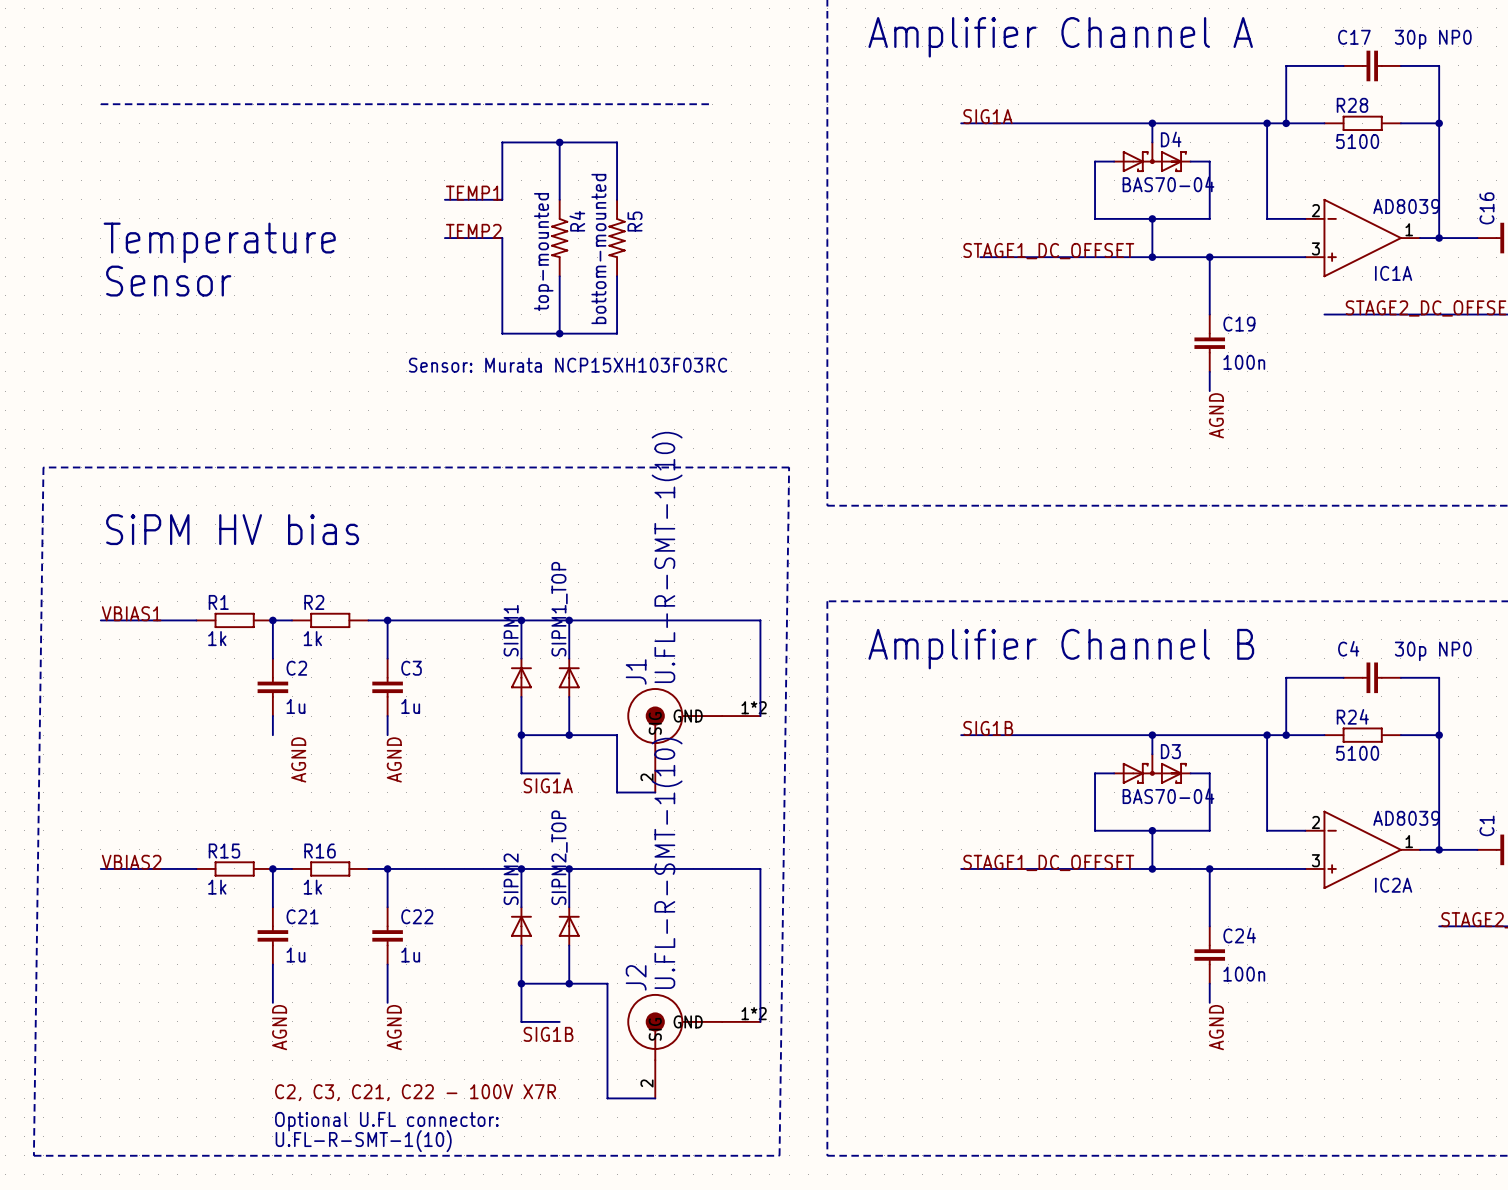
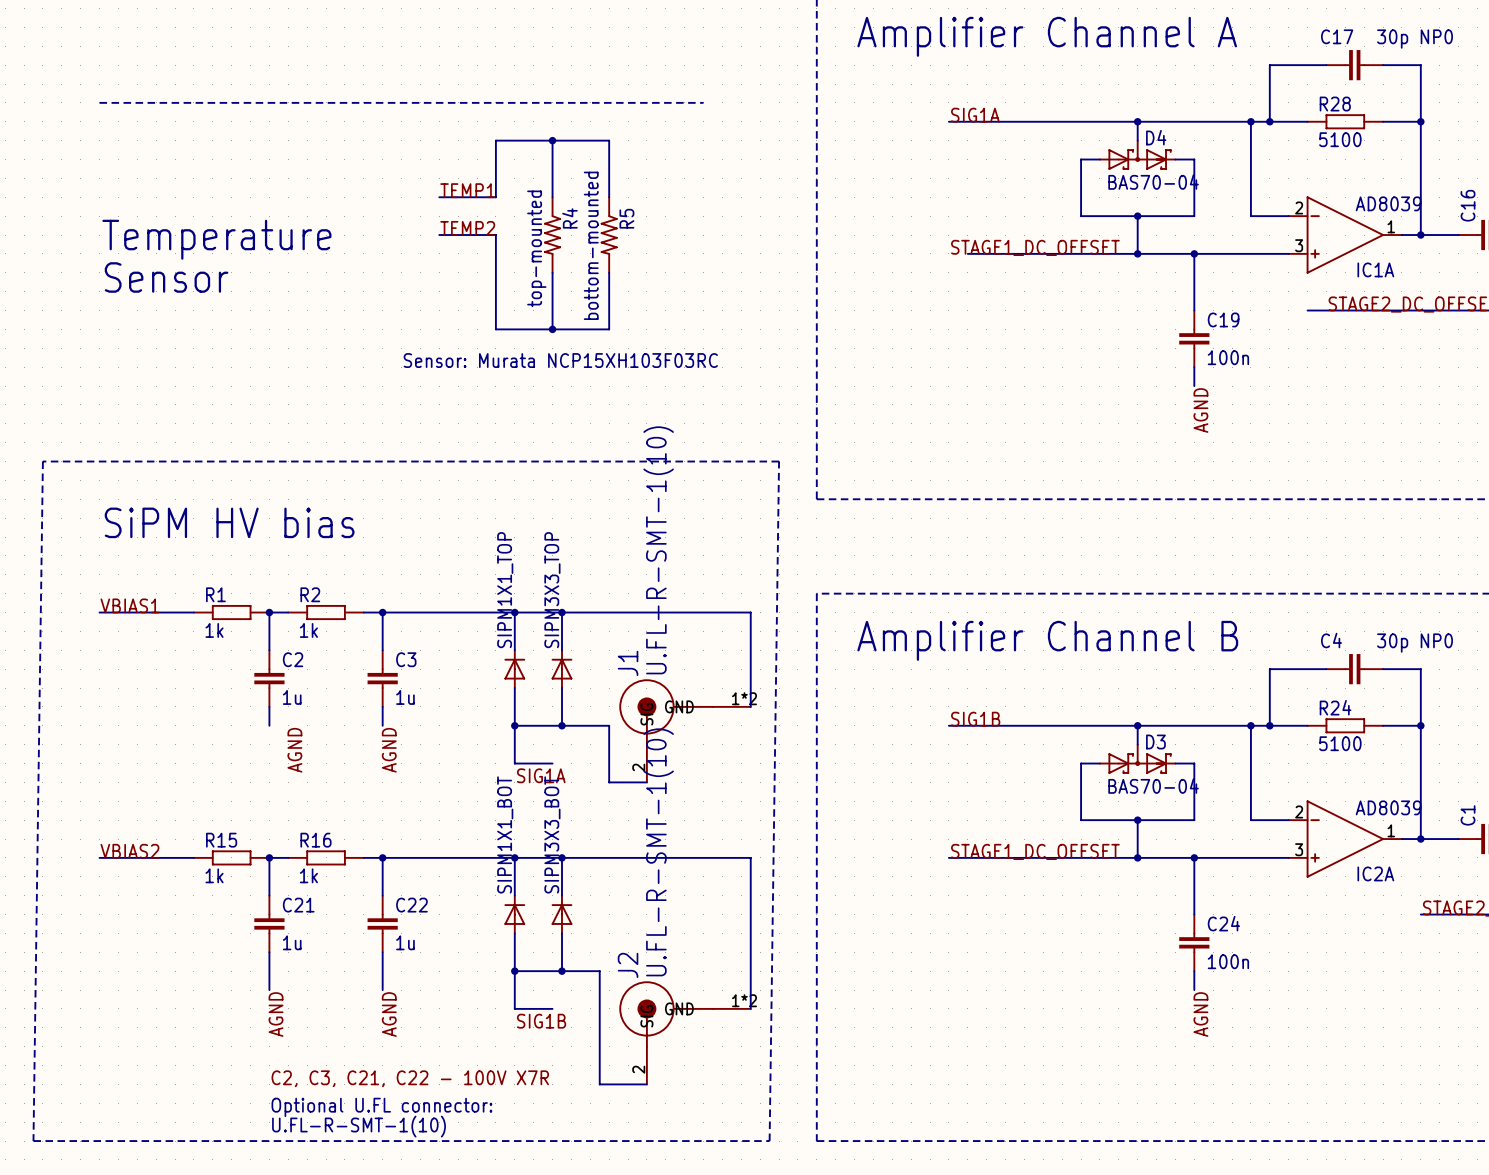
SIPM1_TOP name: SIPM1_TOP (559, 609) -> SIPM3X3_TOP (552, 590)
SIPM1 name: SIPM1 (511, 630) -> SIPM1X1_TOP (505, 590)
SIPM2_TOP name: SIPM2_TOP (559, 857) -> SIPM3X3_BOT (552, 834)
SIPM2 name: SIPM2 (511, 879) -> SIPM1X1_BOT (505, 834)

